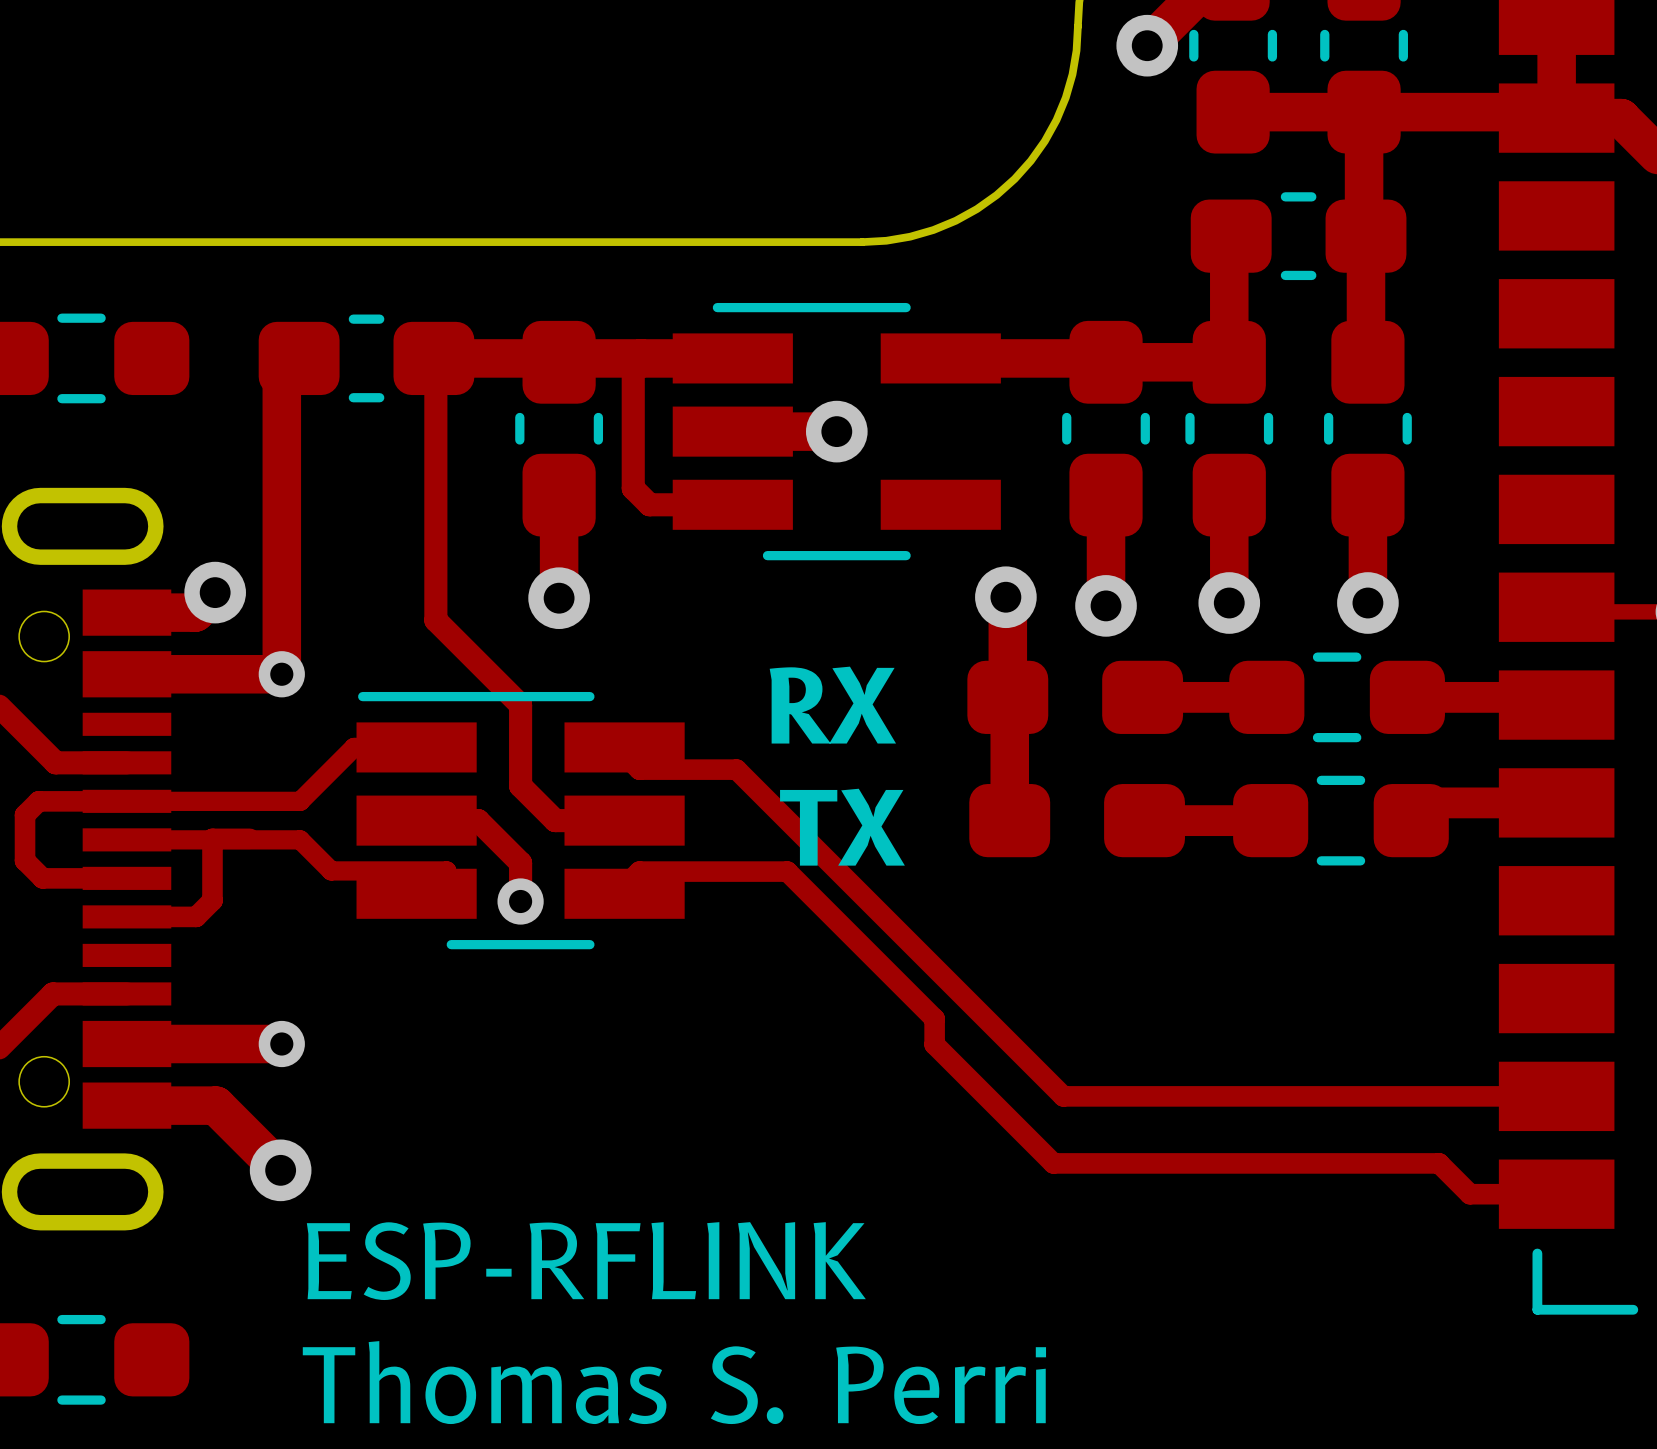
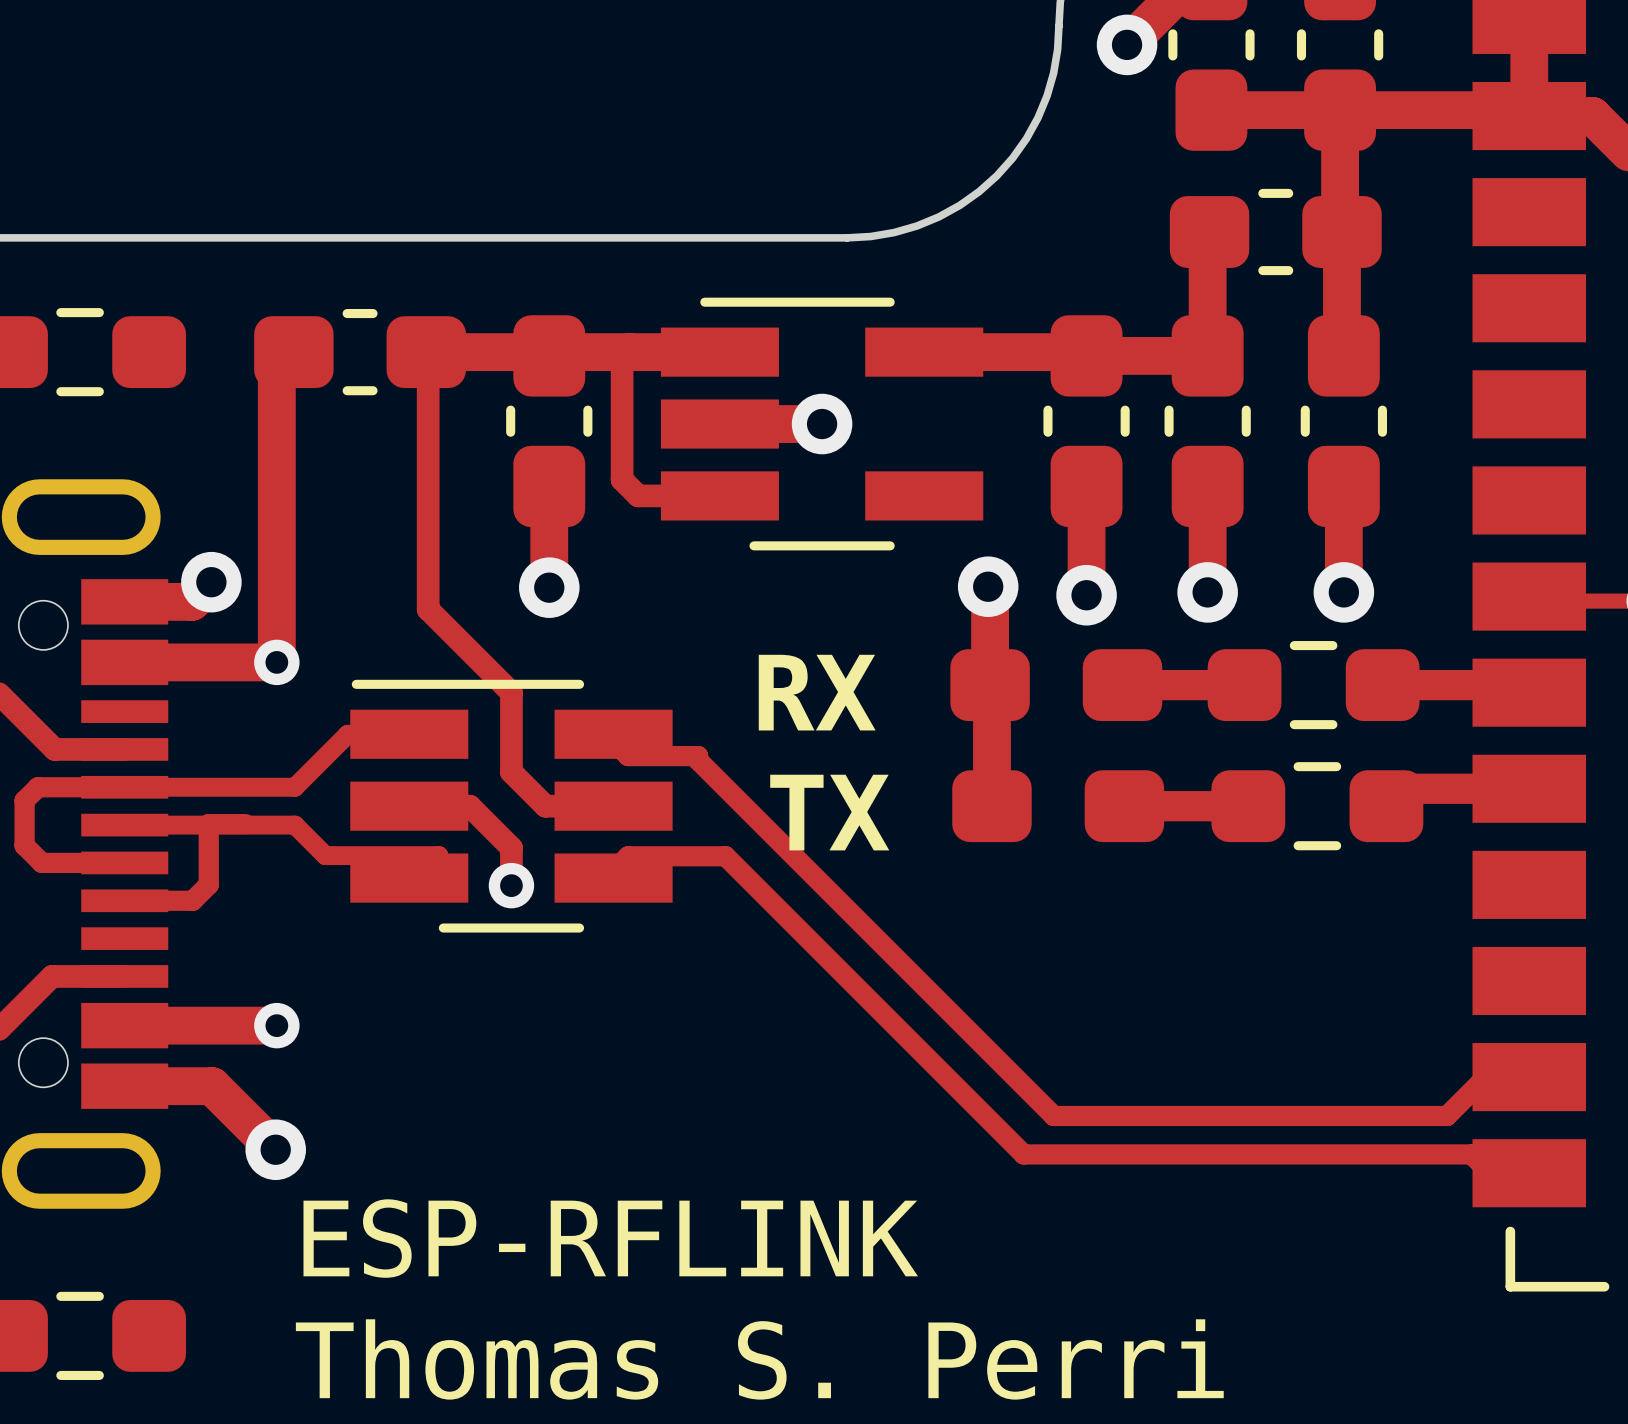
track: (710, 769) (736, 769) (1063, 1096) (1512, 1096) -> (698, 756) (698, 760) (1053, 1116) (1447, 1116) (1485, 1077)
track: (738, 871) (787, 871) (934, 1018) (934, 1044) (1053, 1163) (1439, 1163) (1469, 1194) (1516, 1194) -> (725, 856) (1023, 1154) (1471, 1154) (1490, 1173)

